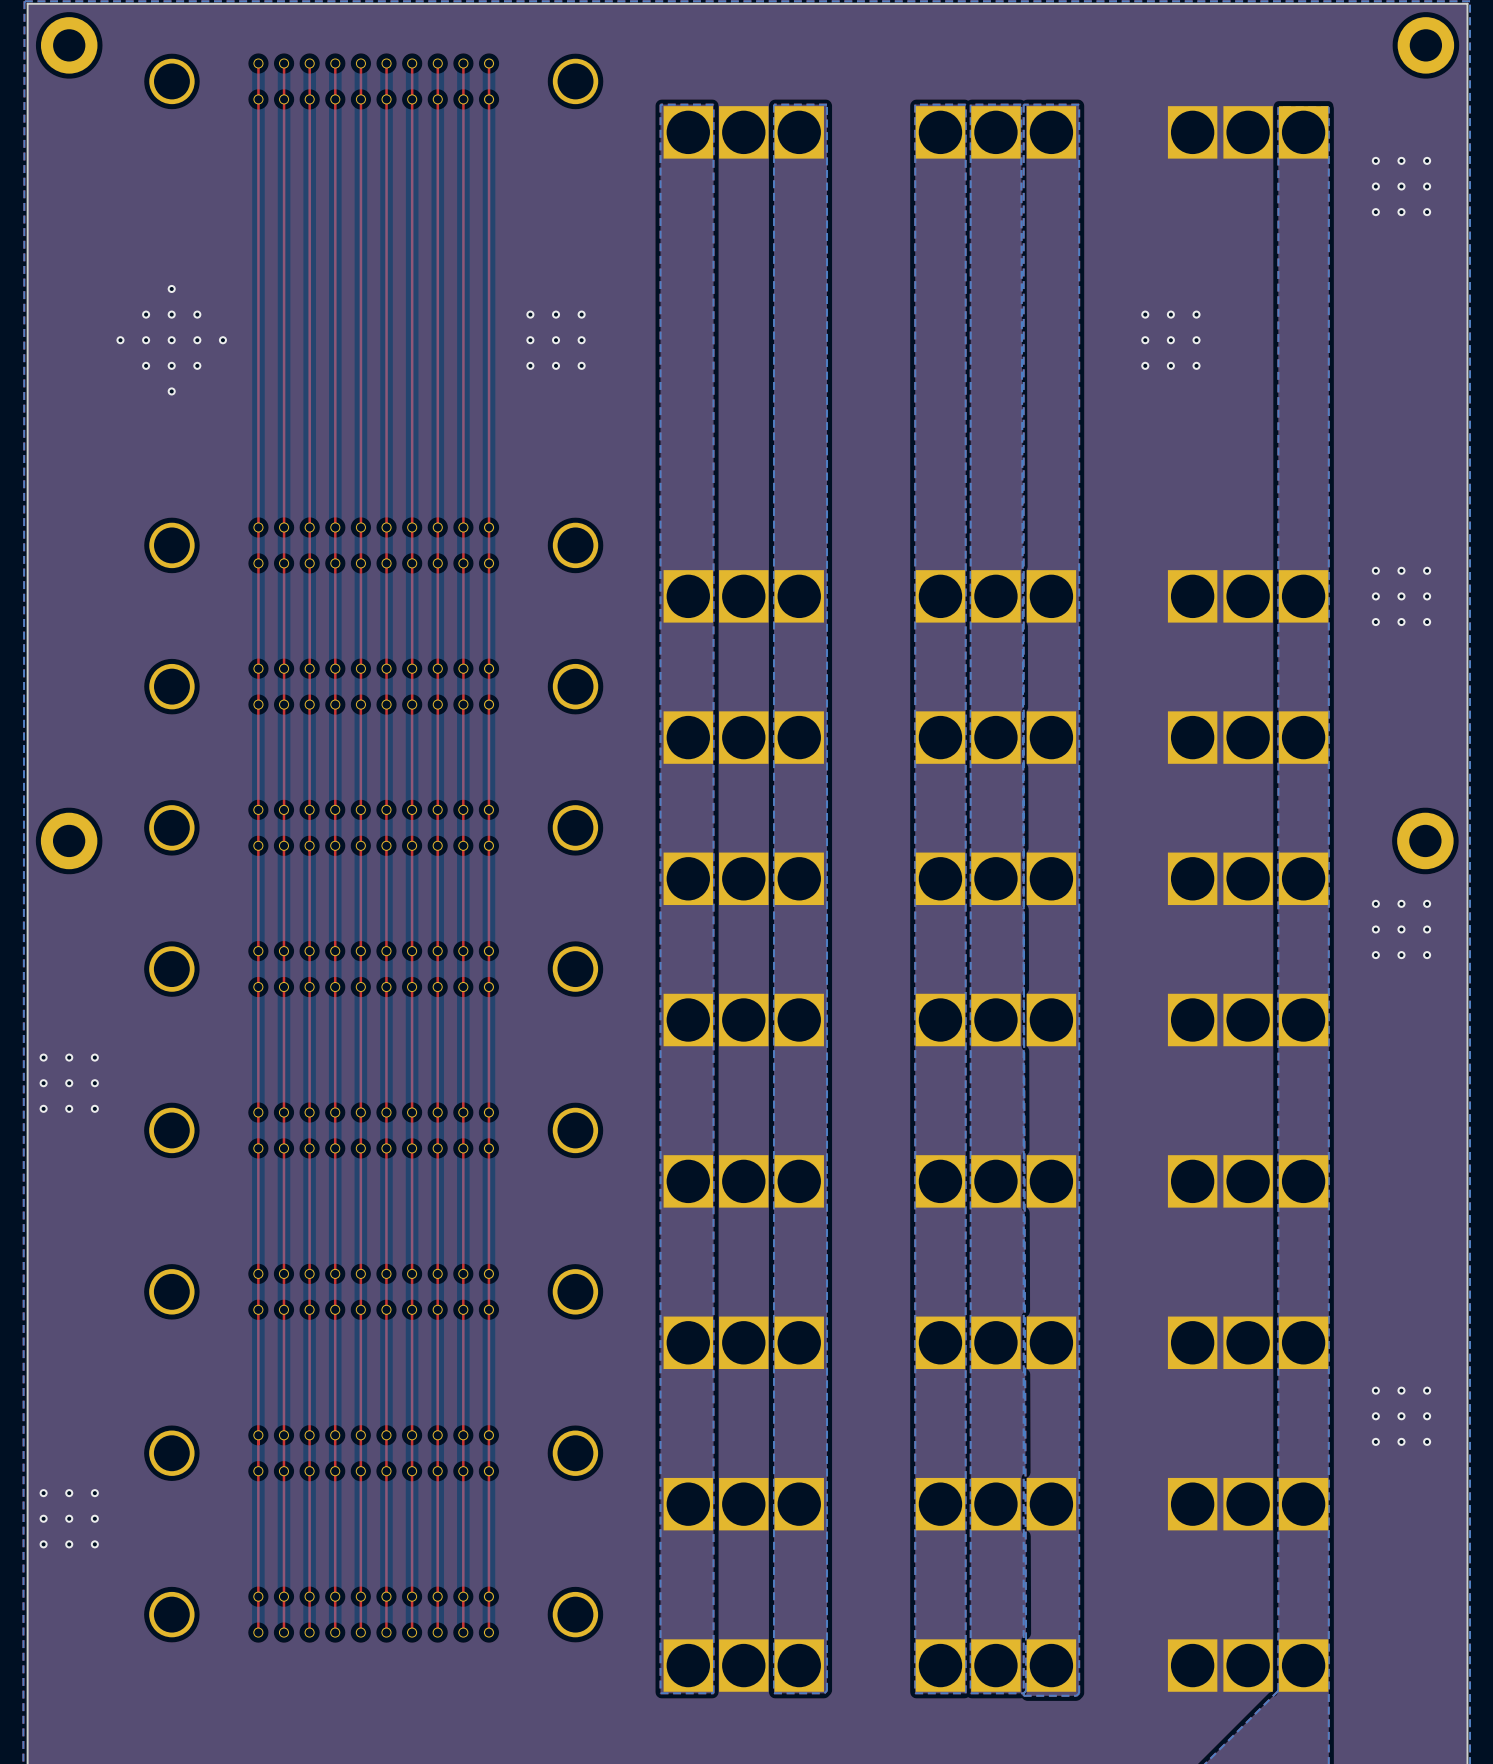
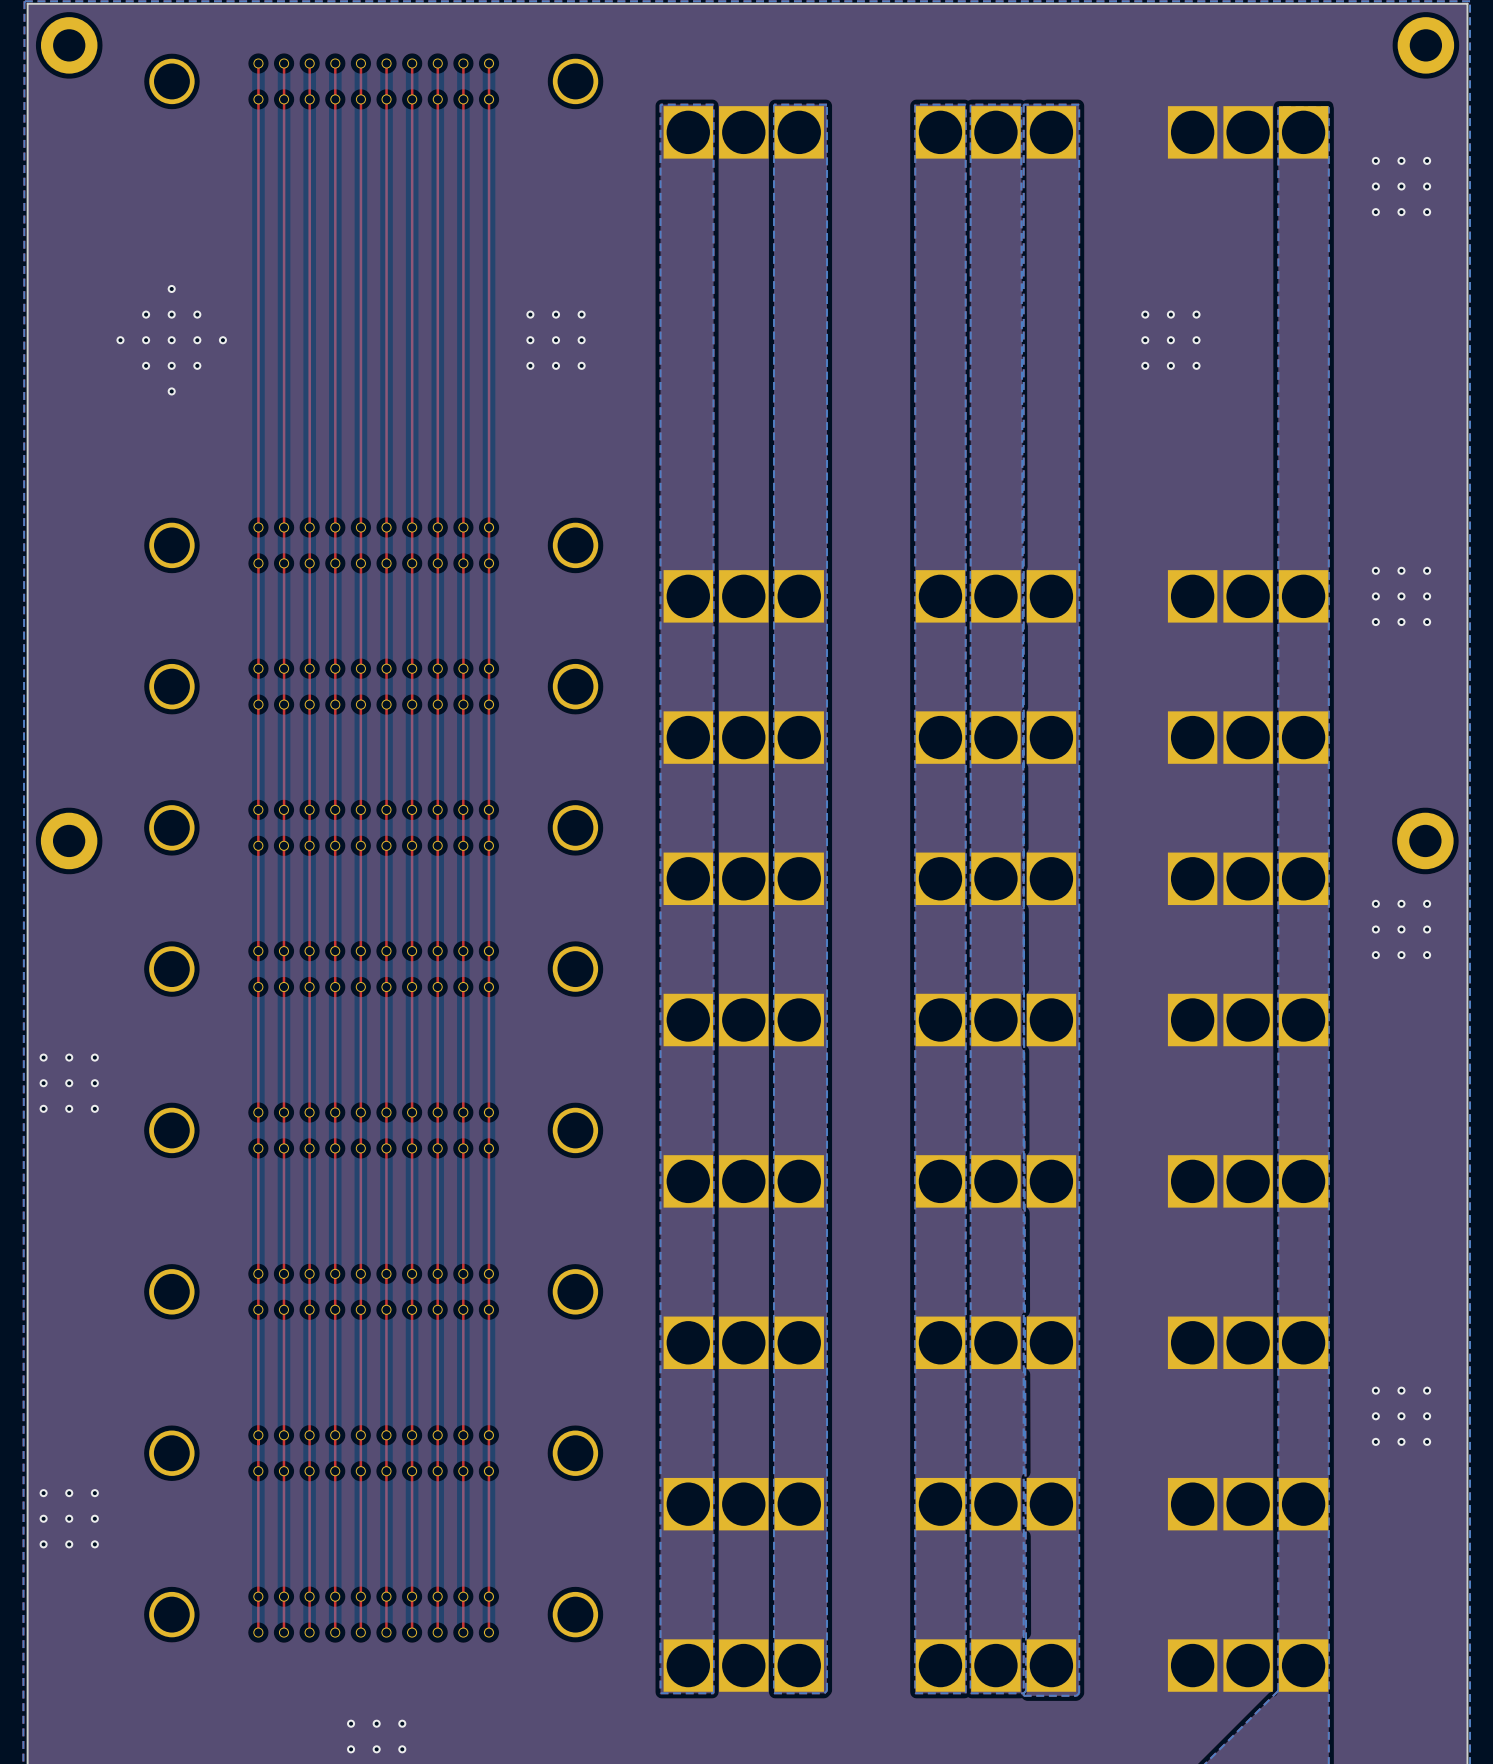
via: none -> (351, 1723)
via: none -> (376, 1723)
via: none -> (402, 1723)
via: none -> (351, 1749)
via: none -> (376, 1749)
via: none -> (402, 1749)

